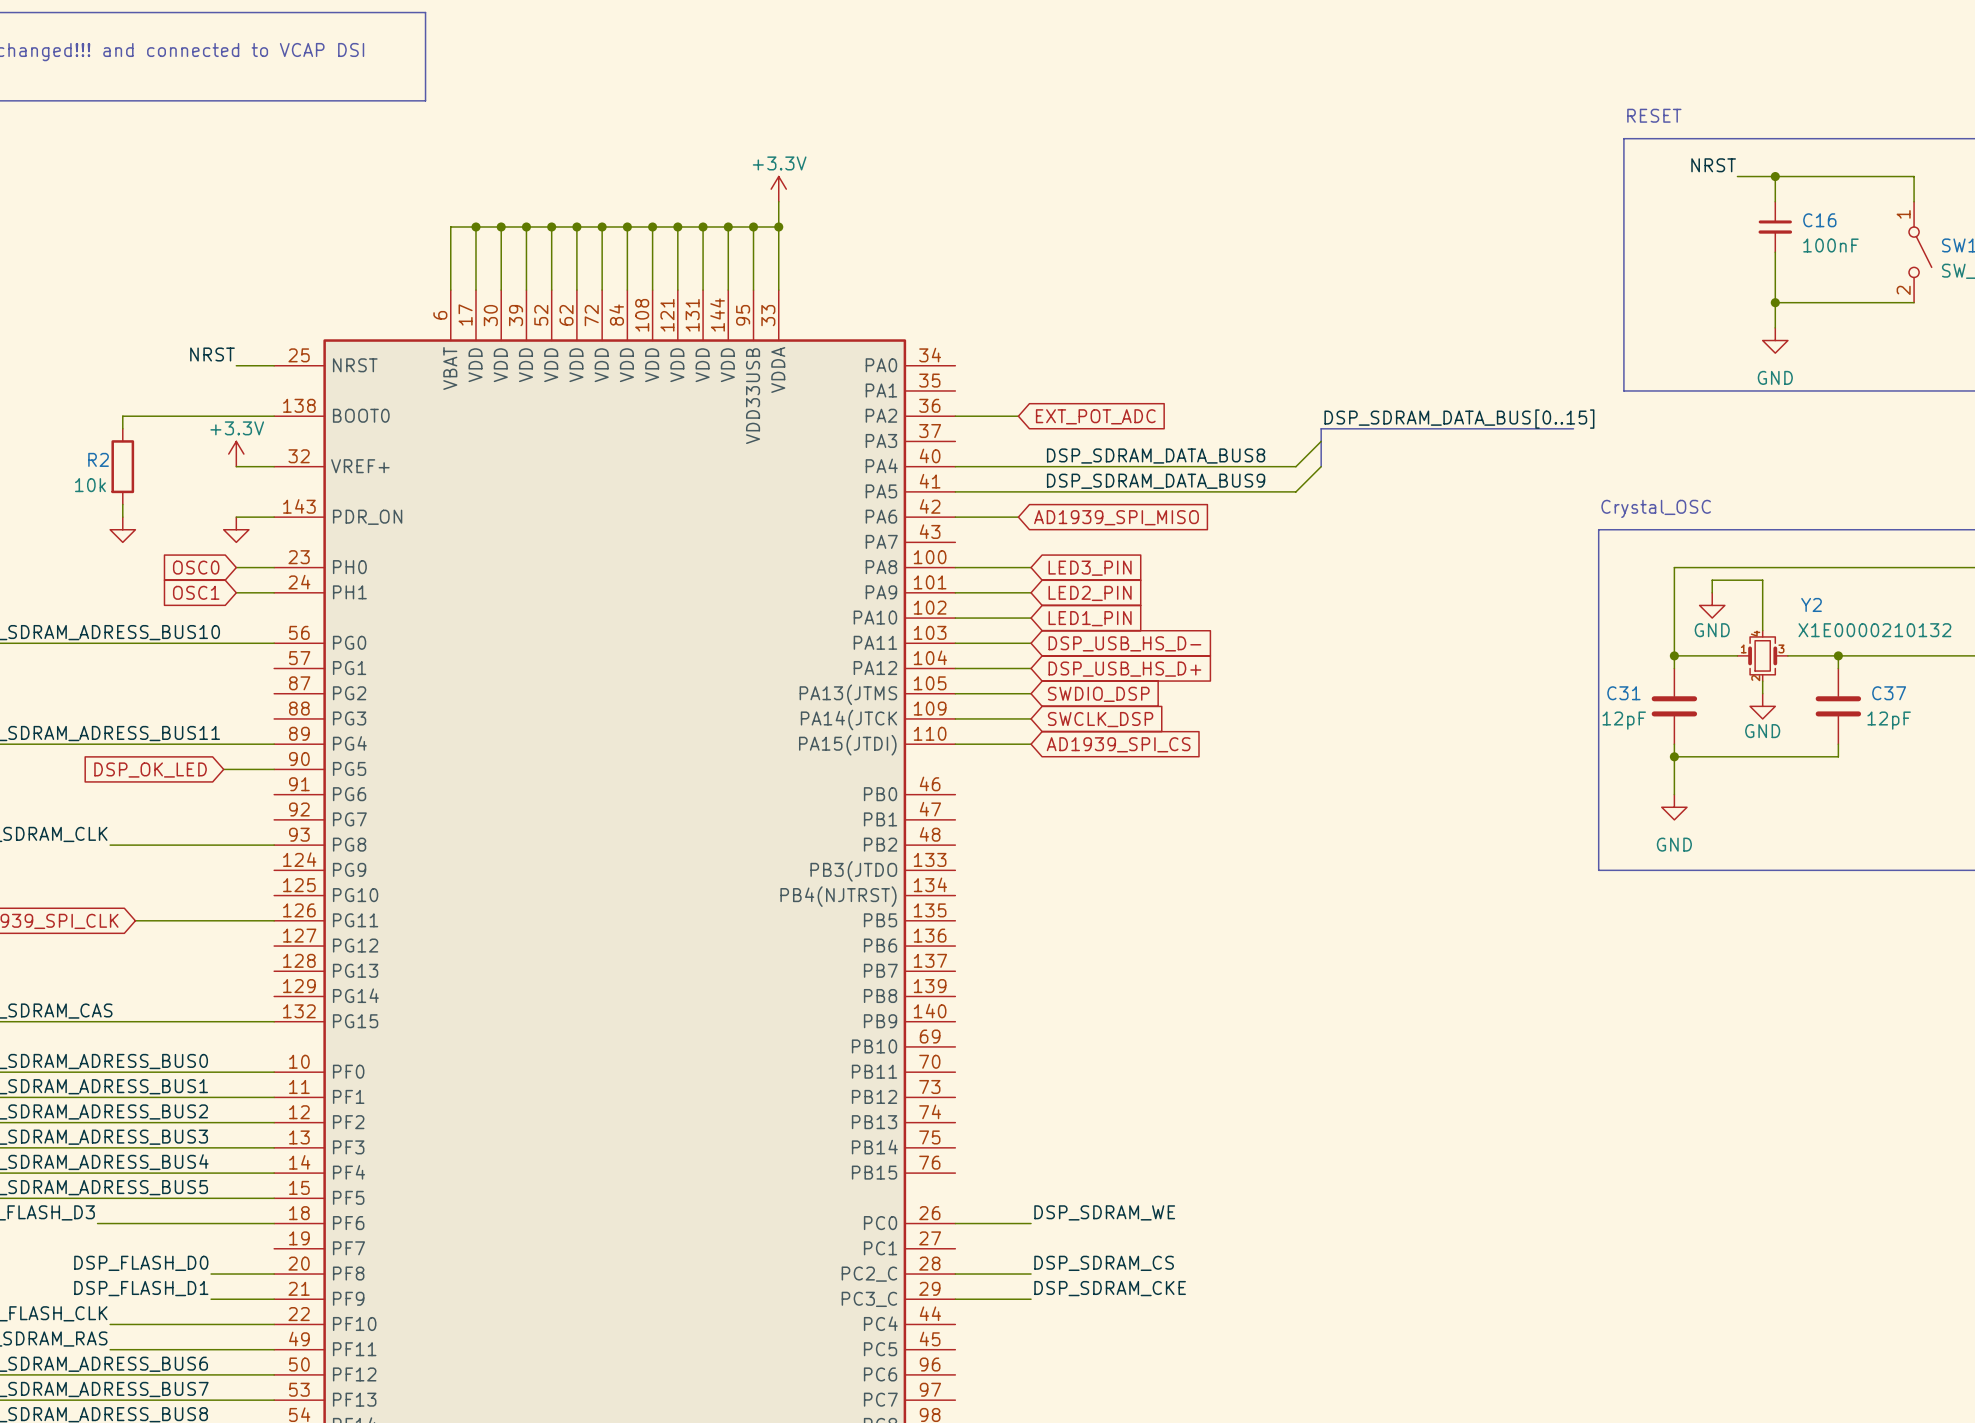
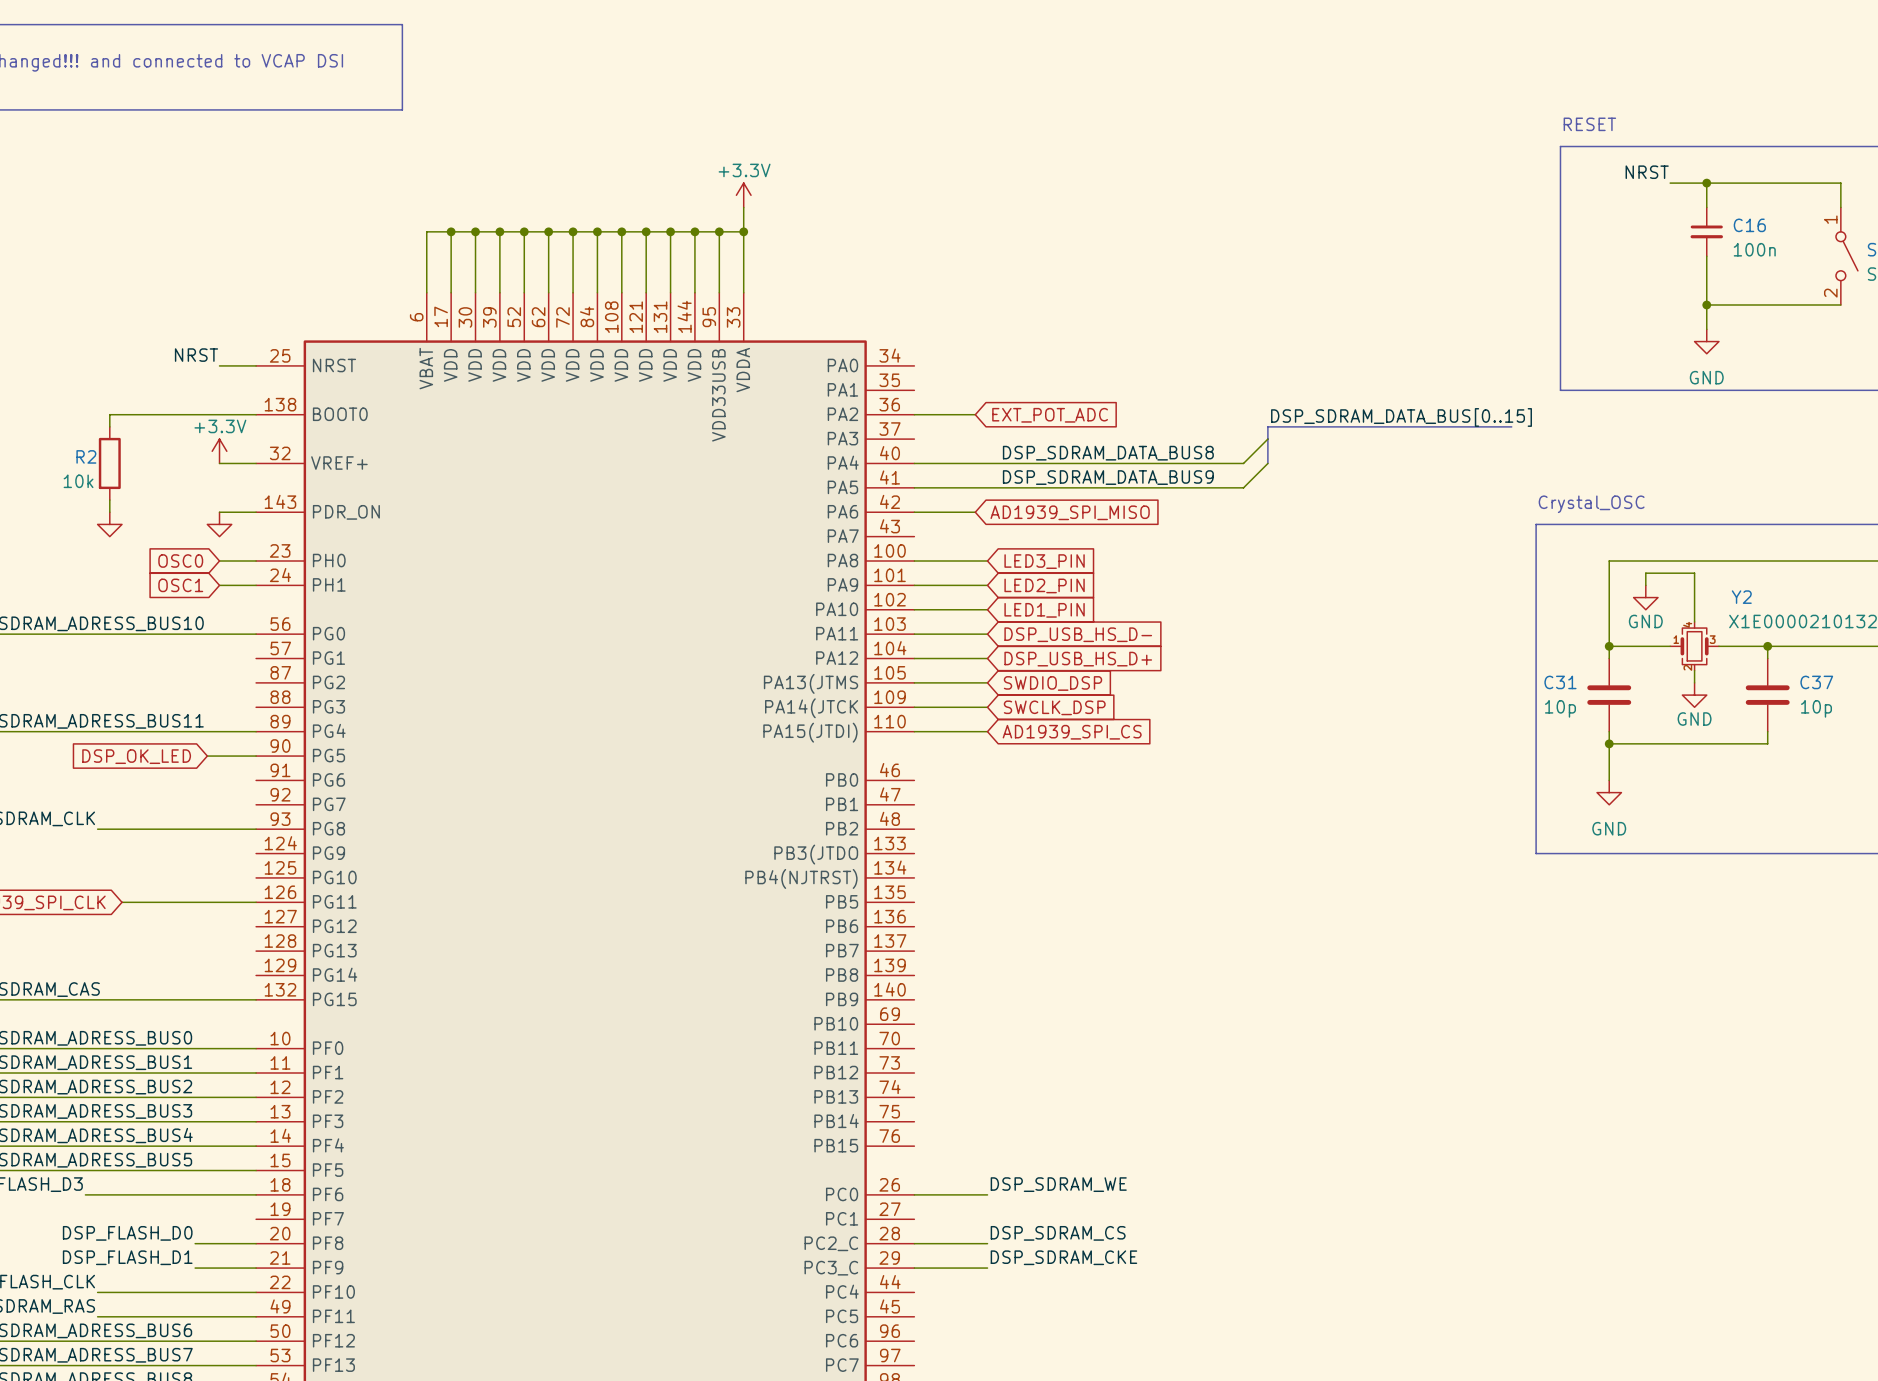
C16 value: 100nF (1830, 245) -> 100n (1754, 249)
C31 value: 12pF (1624, 720) -> 10p (1560, 708)
C37 value: 12pF (1889, 720) -> 10p (1816, 708)

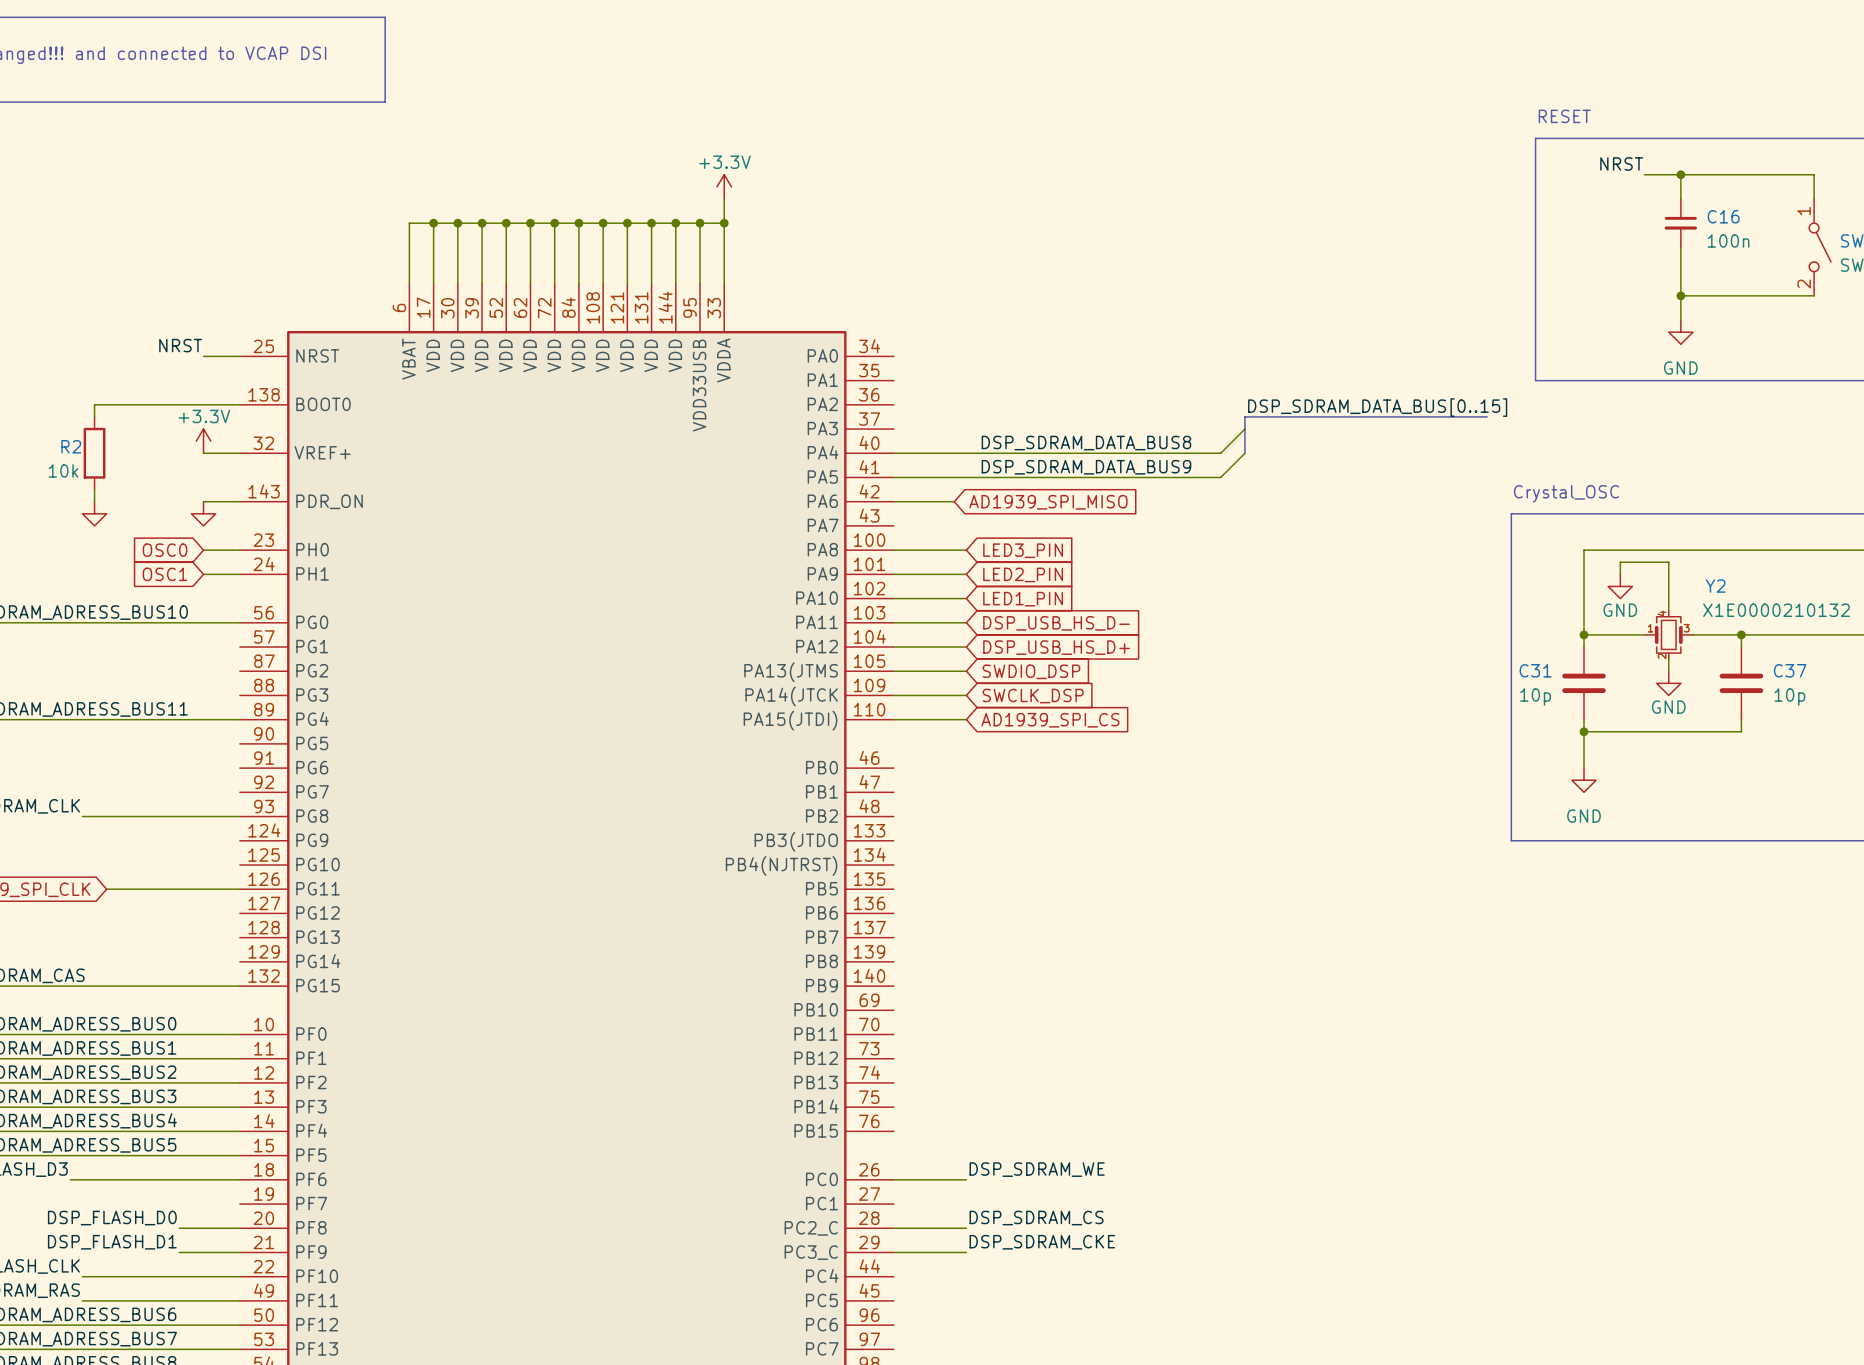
wire: (914, 414) (975, 414) -> none
global label: EXT_POT_ADC (1050, 415) -> none
global label: DSP_OK_LED (136, 756) -> none
wire: (207, 756) (256, 756) -> none

